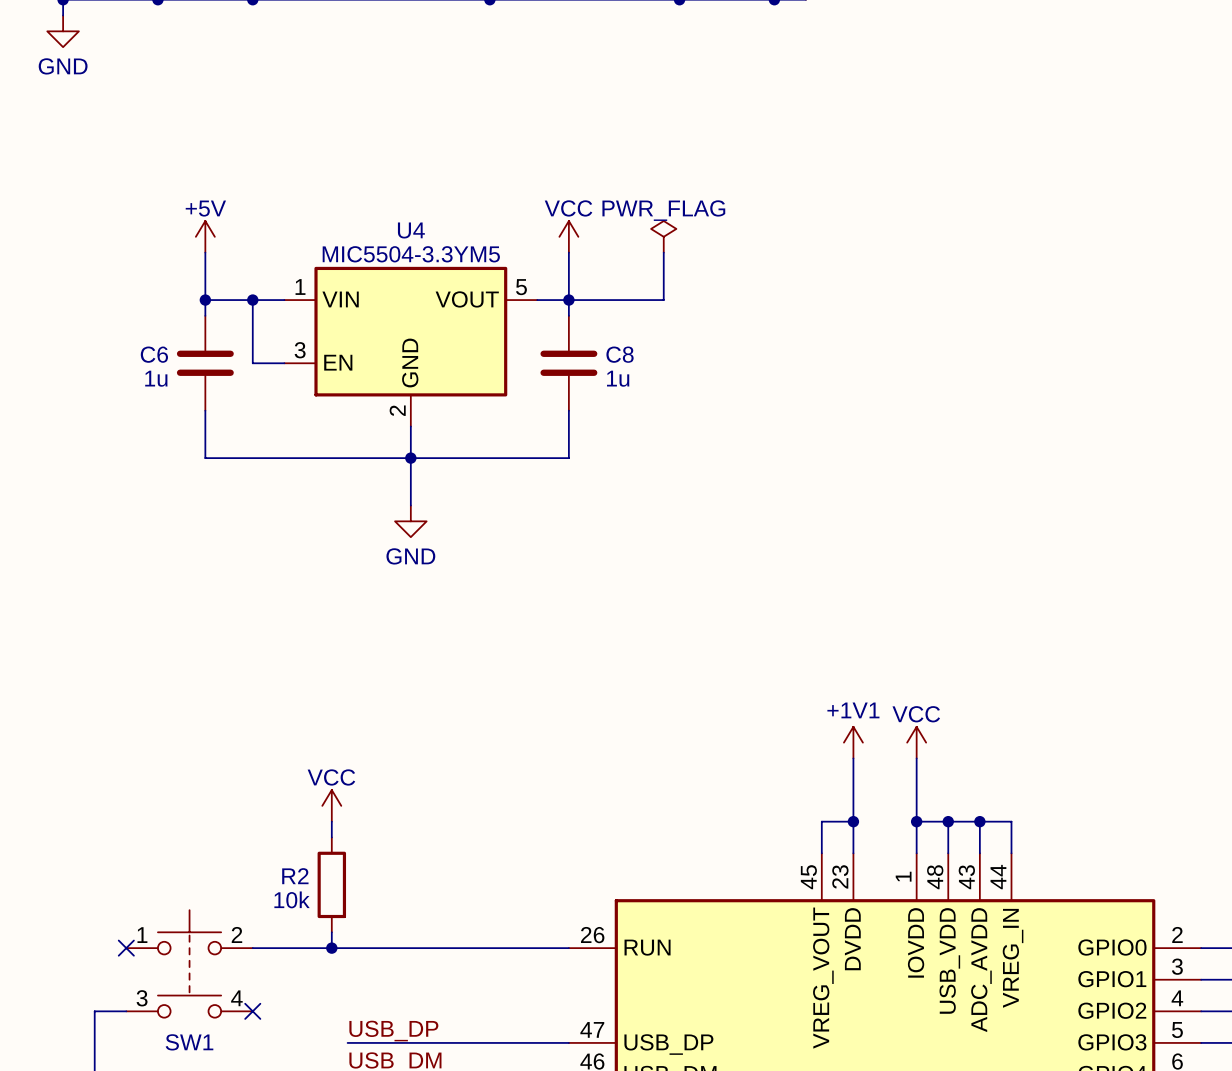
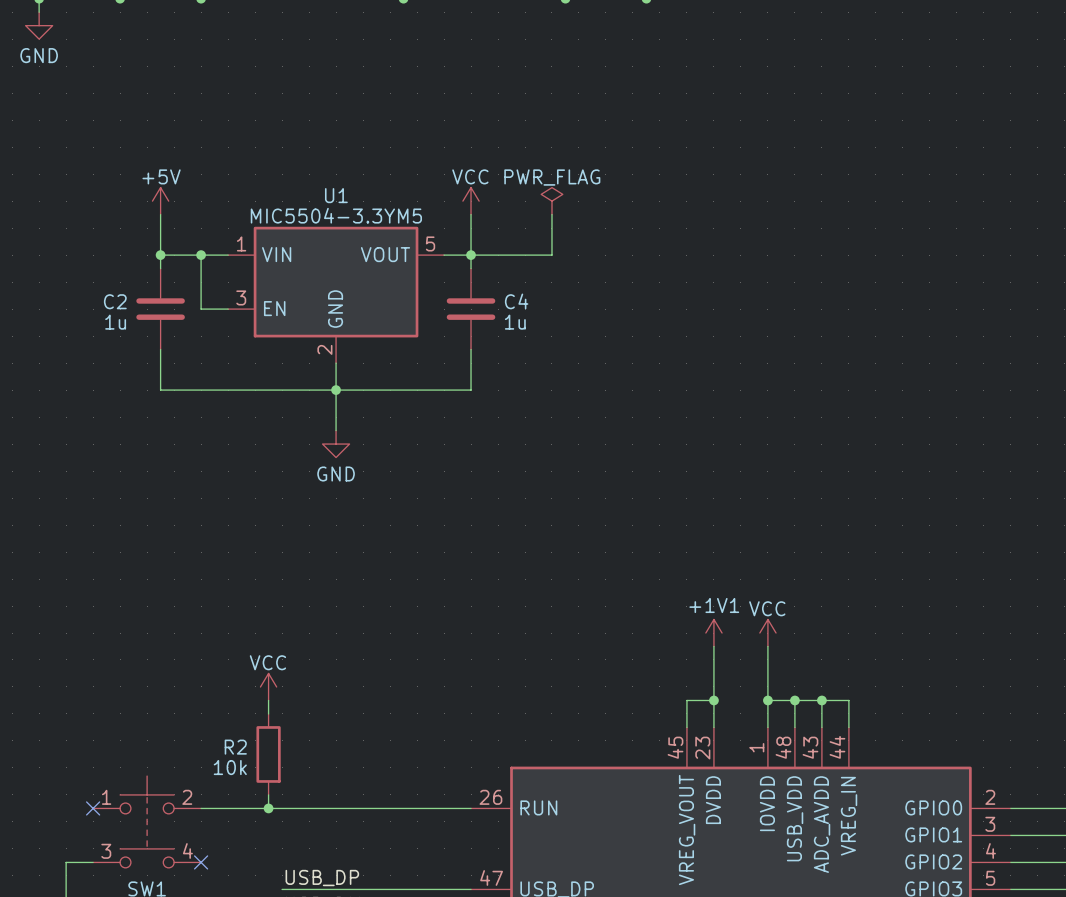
U4 name: U4 (411, 230) -> U1 (336, 195)
C6 name: C6 (154, 354) -> C2 (115, 301)
C8 name: C8 (620, 354) -> C4 (516, 301)

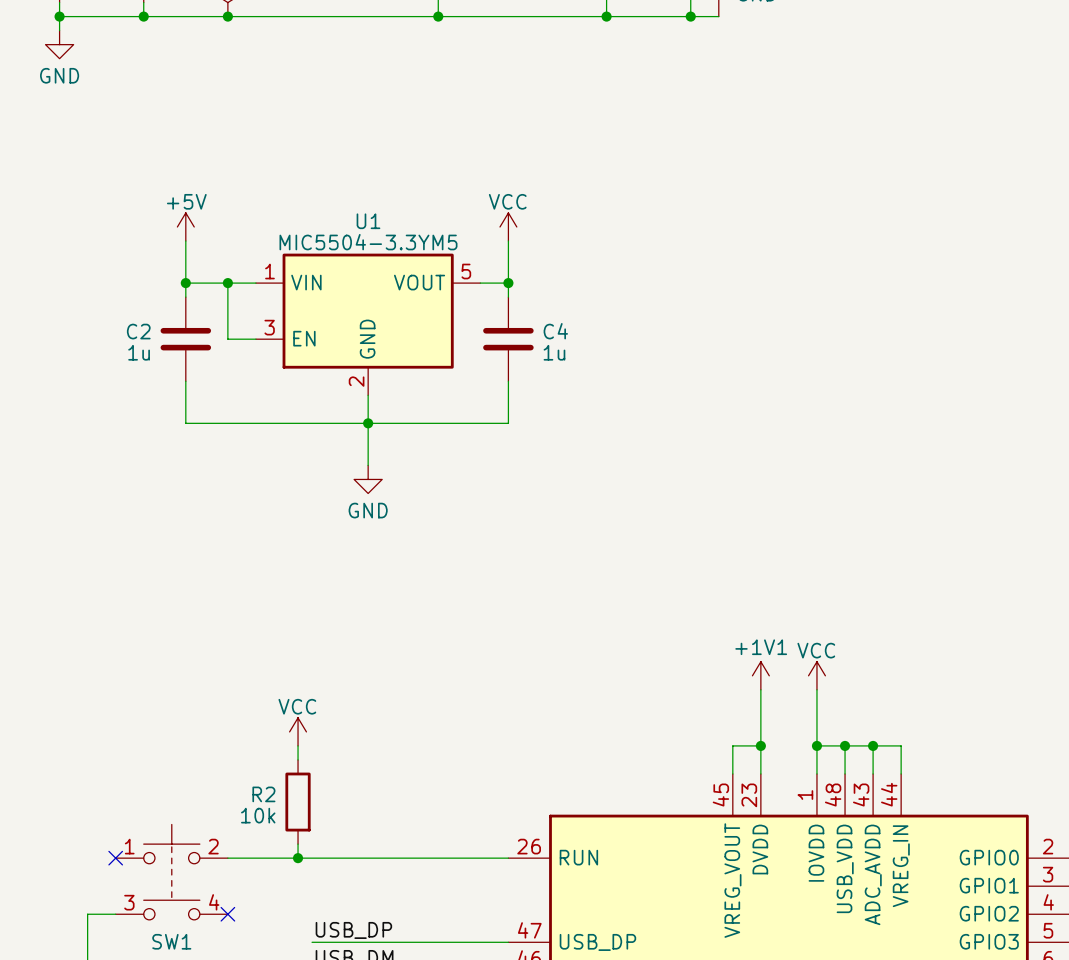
power symbol: PWR_FLAG (551, 201) -> none
wire: (551, 214) (551, 255) (471, 255) -> none

